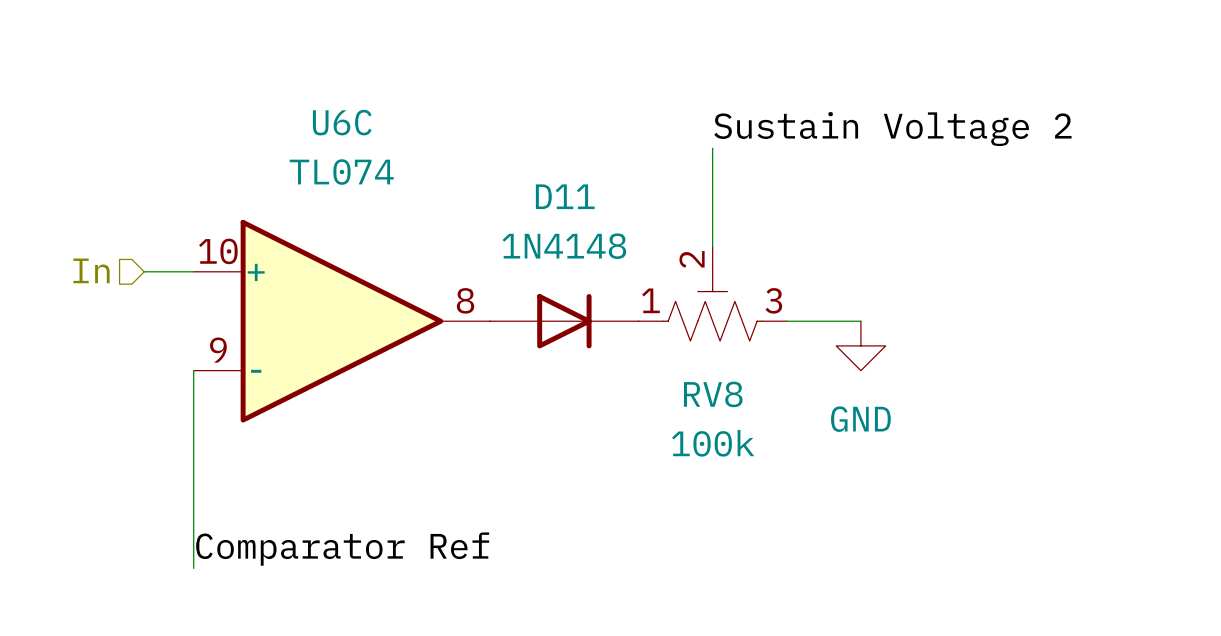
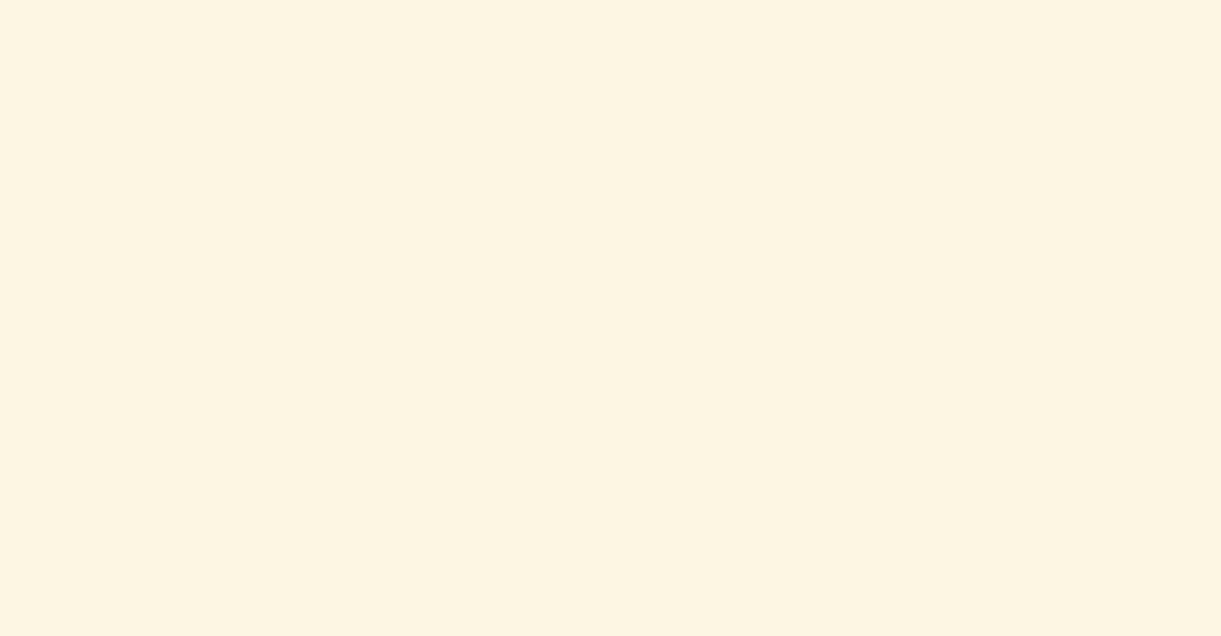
label: Sustain Voltage 2 (892, 129) -> none
wire: (712, 148) (712, 247) -> none
hierarchical label: In (91, 270) -> none
wire: (144, 271) (193, 271) -> none
RV8: 100k (712, 294) -> none
U6C: TL074 (341, 321) -> none
D11: 1N4148 (564, 321) -> none
wire: (786, 321) (860, 321) -> none
power symbol: GND (860, 345) -> none
wire: (193, 370) (193, 568) -> none
label: Comparator Ref (342, 549) -> none

